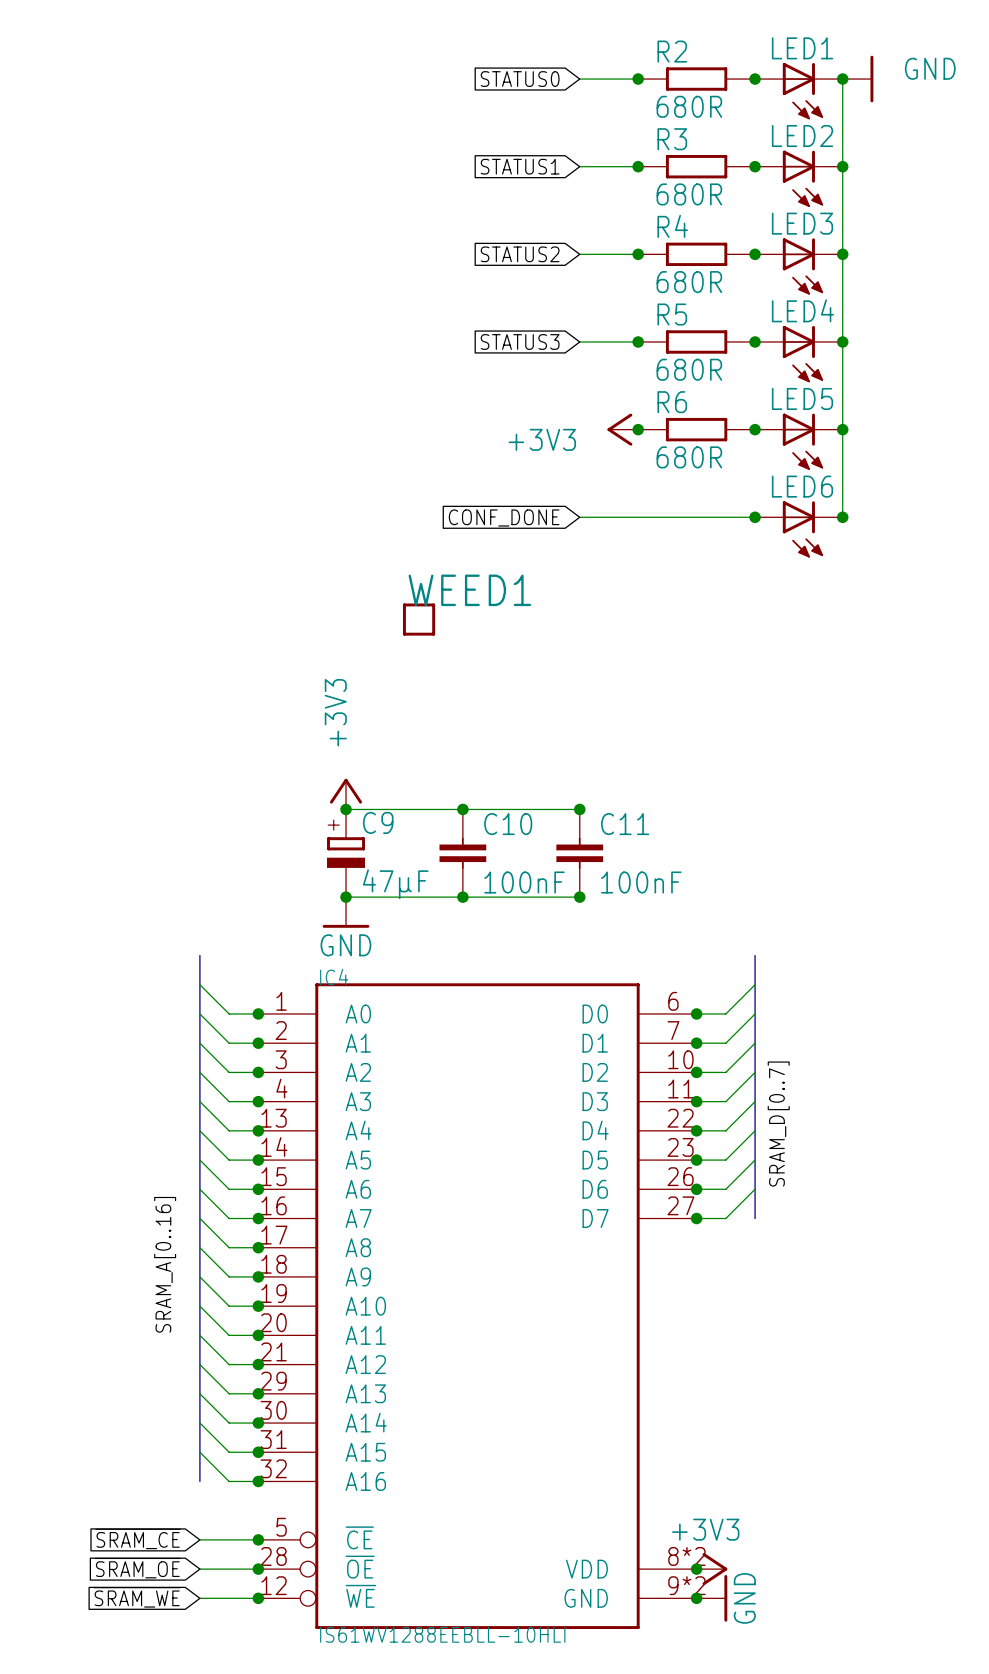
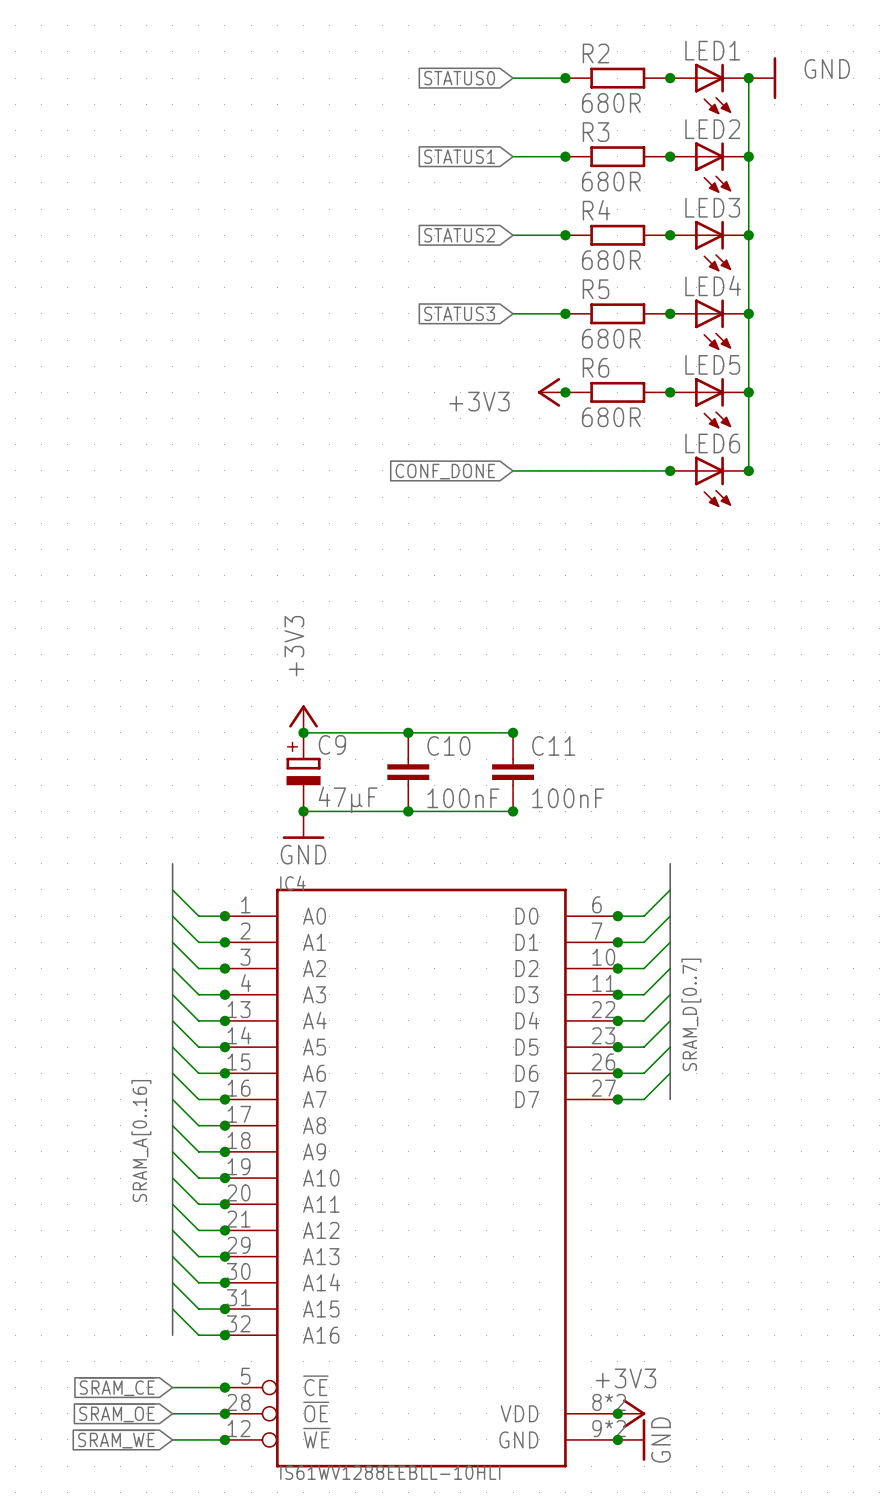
WEED1: (419, 619) -> none

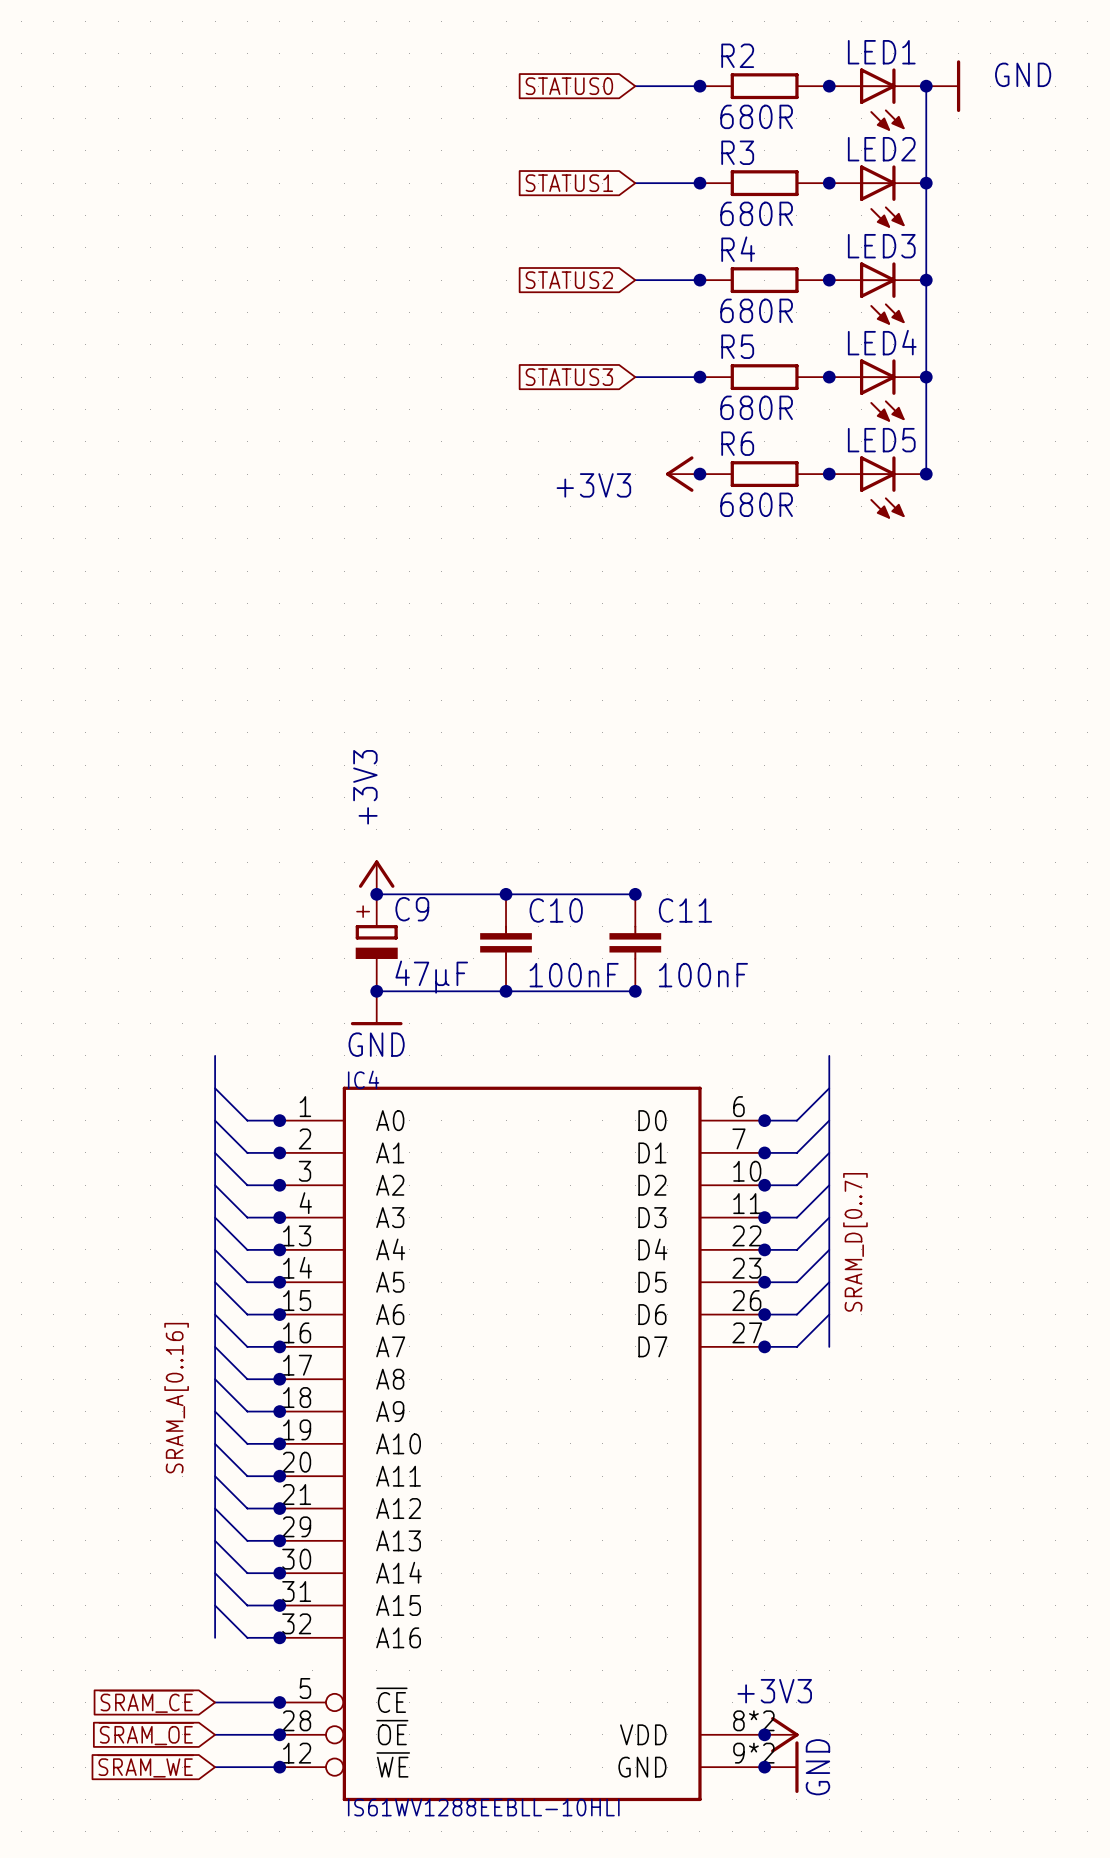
wire: (748, 392) (748, 470) -> none
wire: (513, 470) (670, 470) -> none
junction: (670, 470) -> none
junction: (748, 470) -> none
global label: CONF_DONE (445, 471) -> none
LED6: (709, 481) -> none

